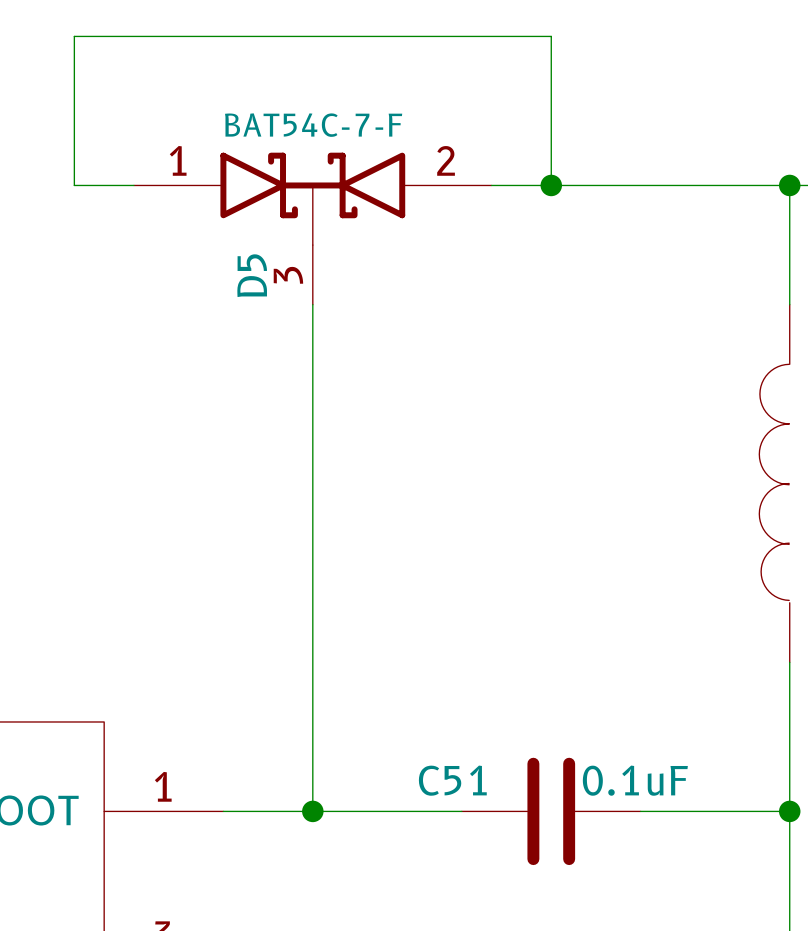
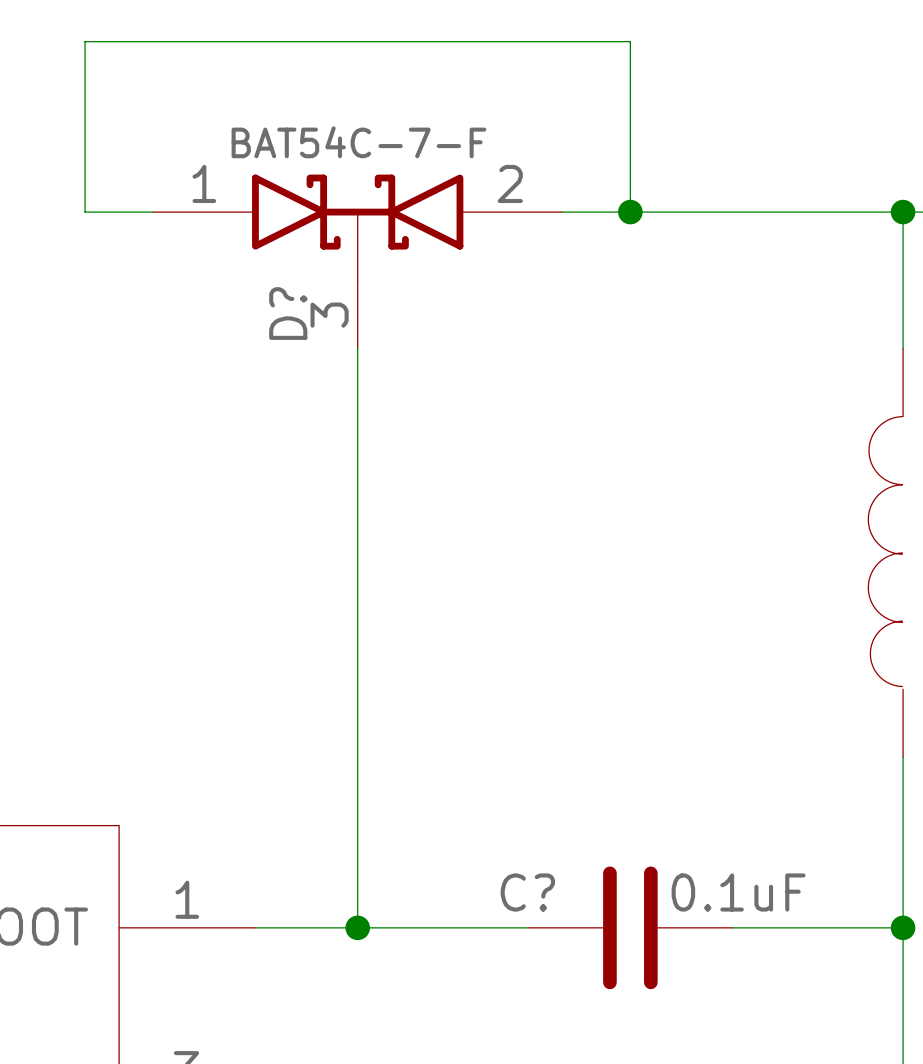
D5 name: D5 (252, 275) -> D? (288, 313)
C51 name: C51 (452, 780) -> C? (527, 892)

